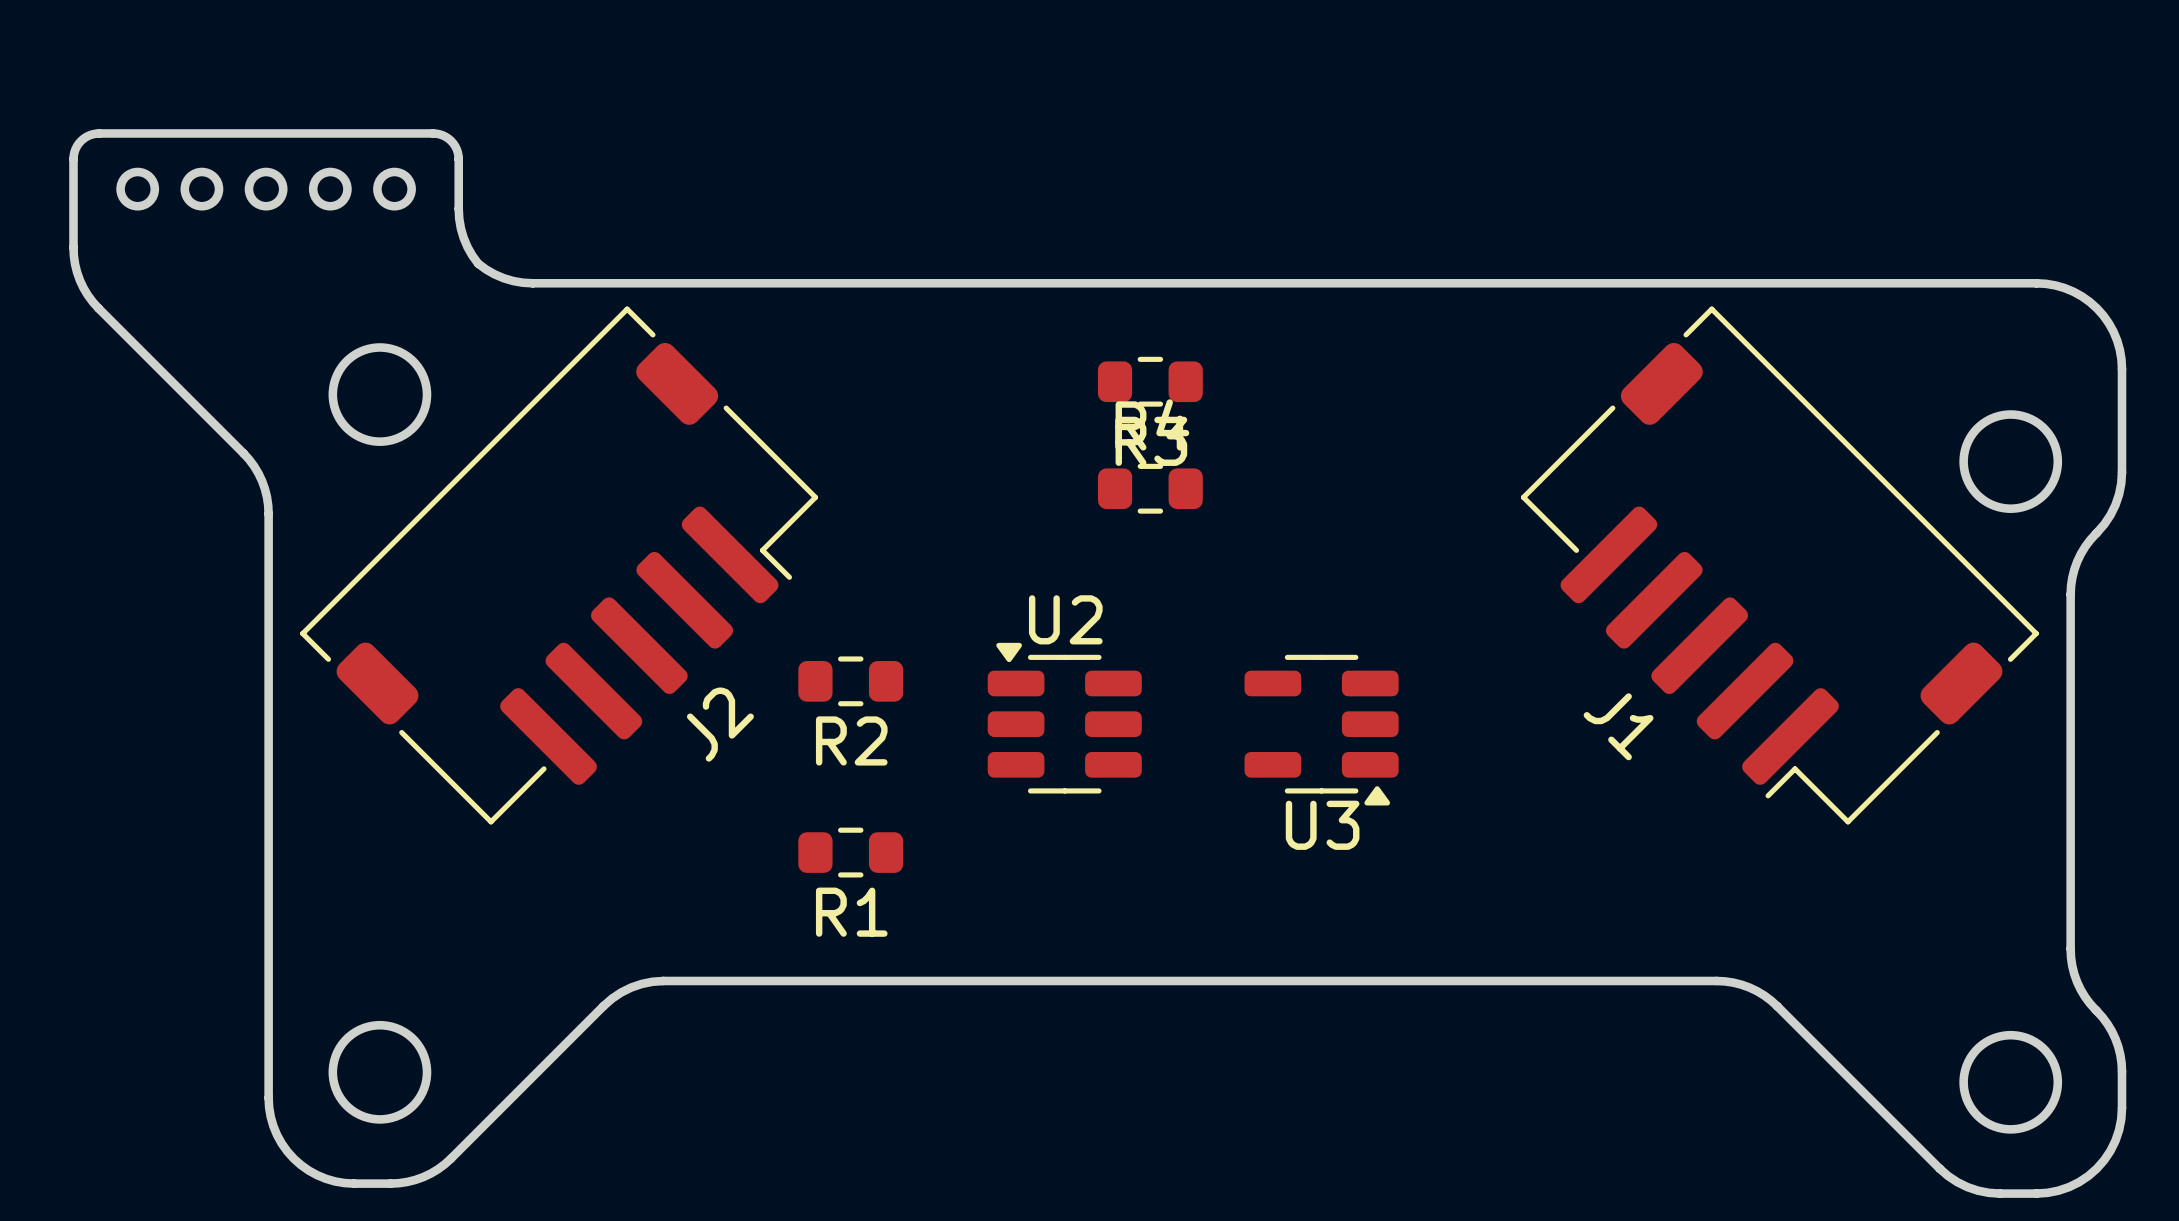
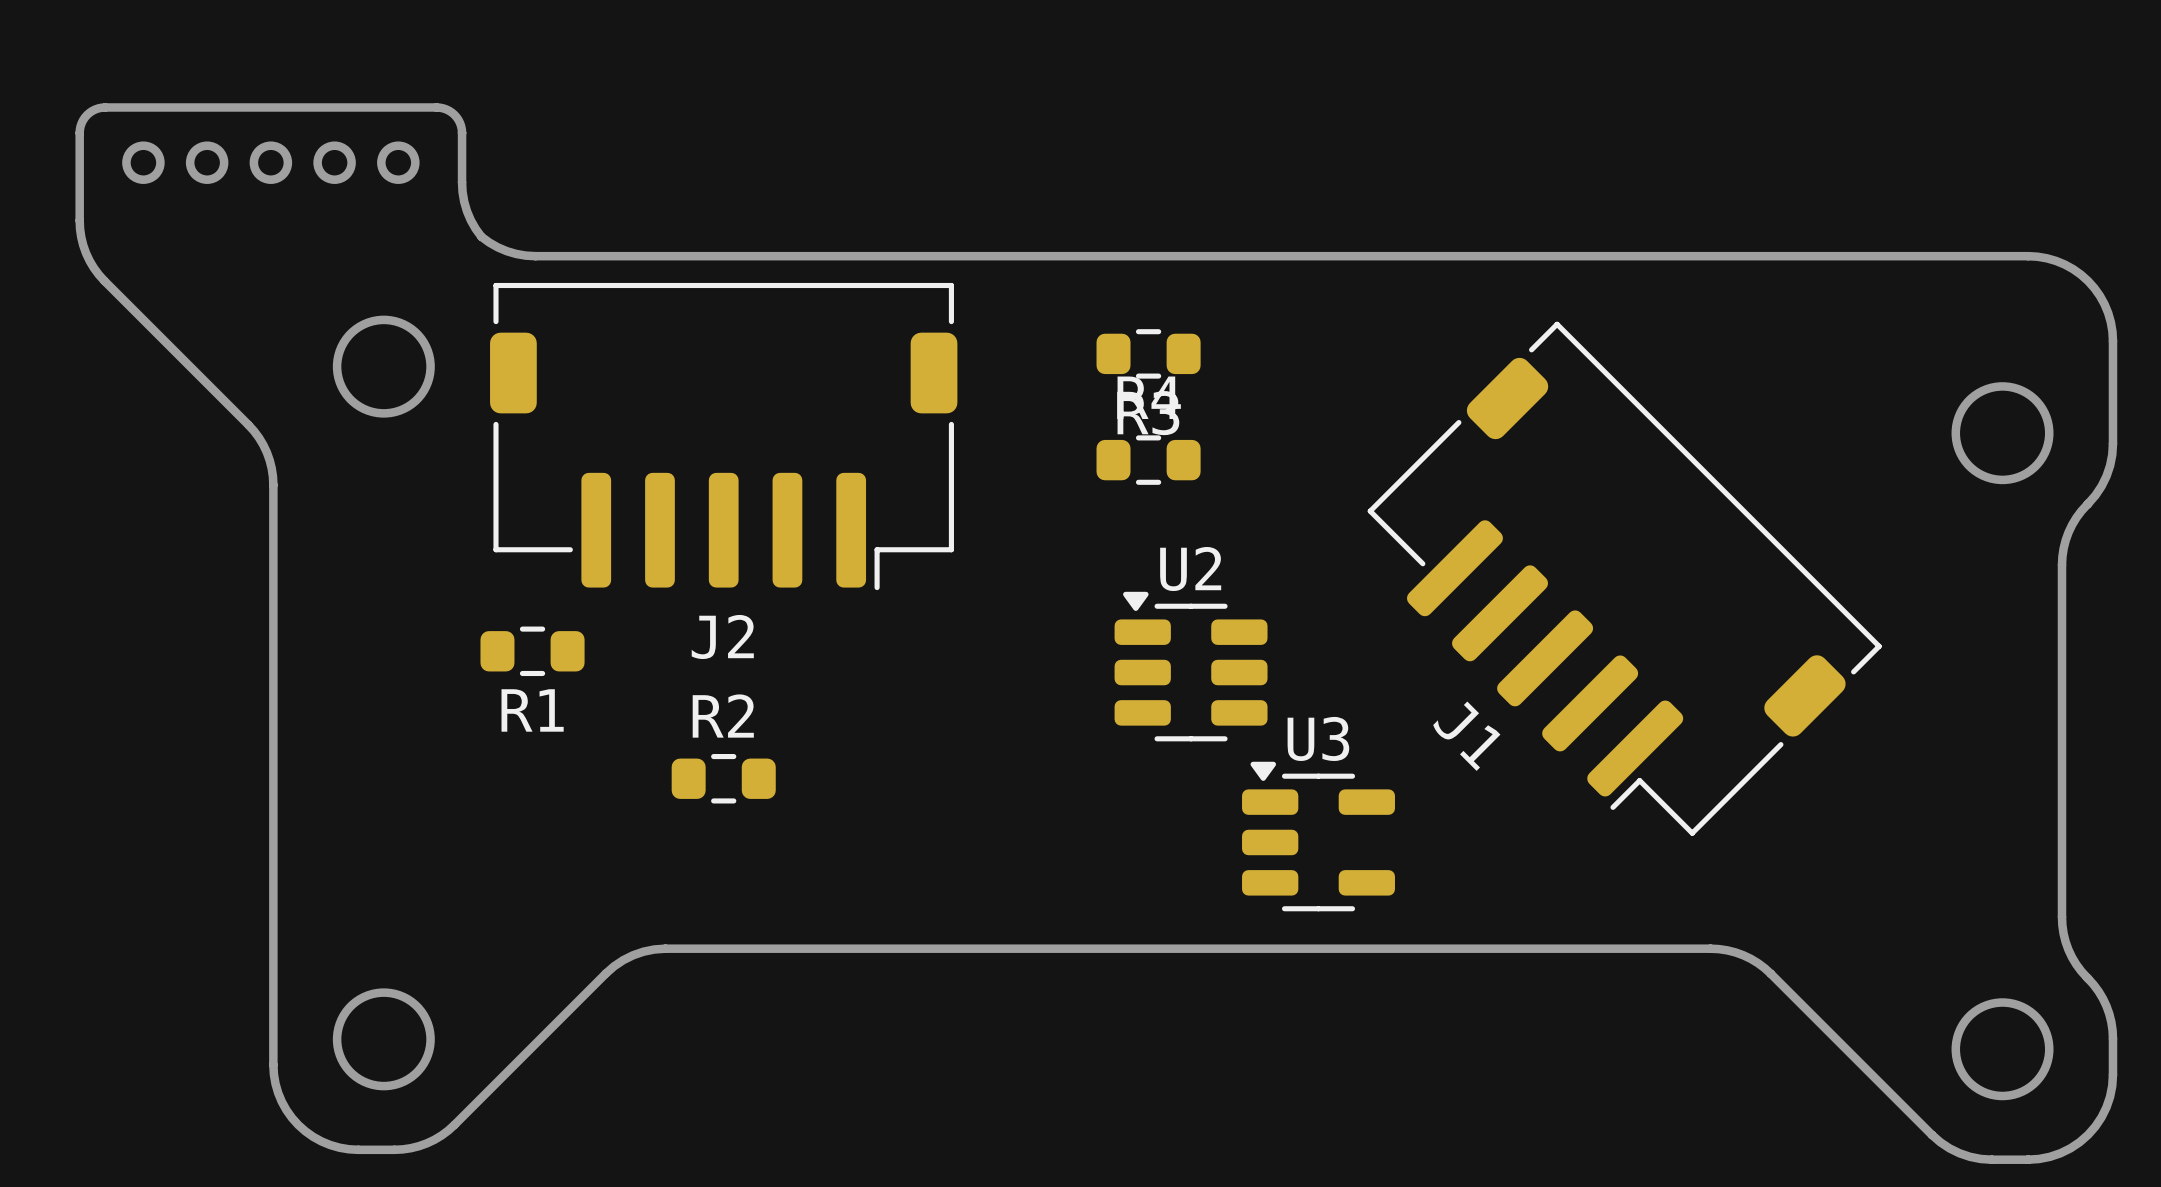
J2 rotation: 0° (559, 565) -> 45° clockwise (723, 436)
J1 position: (1779, 565) -> (1624, 578)
R2 position: (850, 681) -> (723, 778)
U2 position: (1064, 718) -> (1191, 666)
U3 rotation: 0° (1321, 730) -> 180° (1318, 836)
U3 position: (1321, 730) -> (1318, 836)
R2 name position: R2 (851, 740) -> R2 (723, 716)
R1 position: (850, 852) -> (532, 651)

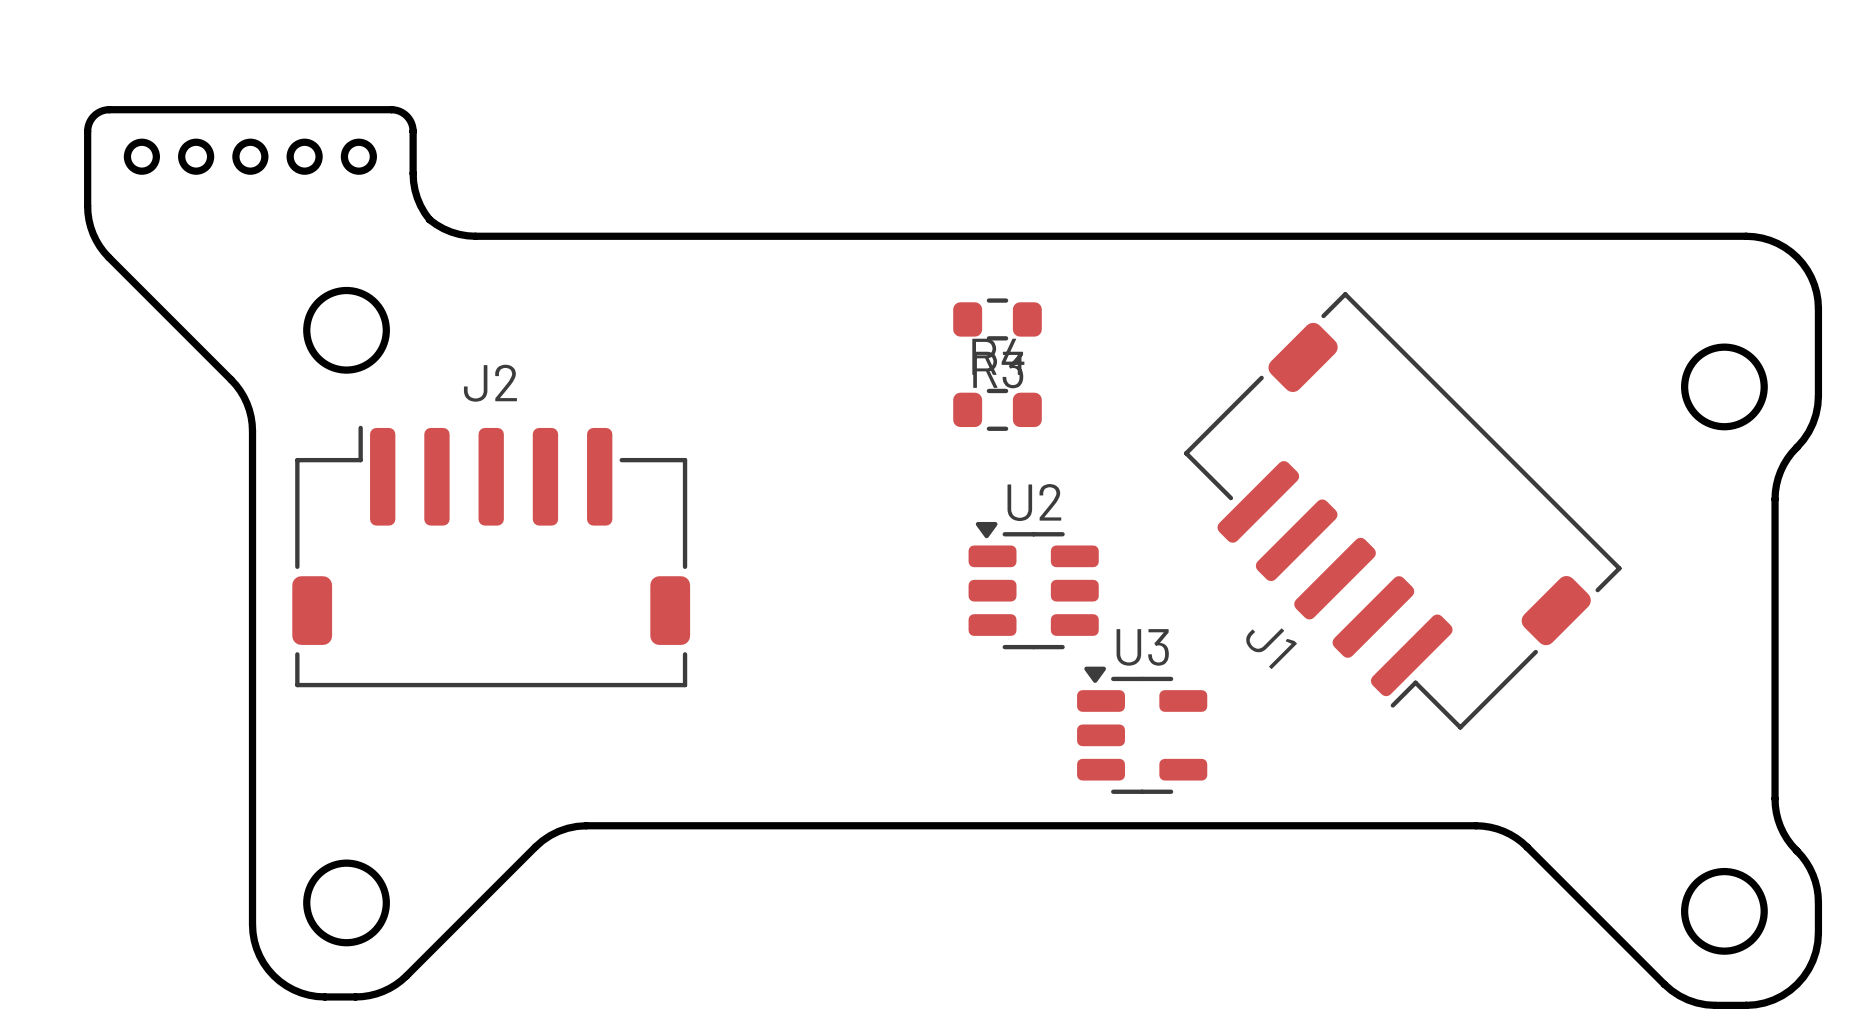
J2 rotation: 0° (723, 436) -> 180° (491, 556)
R1: (532, 651) -> none
R2: (723, 778) -> none

